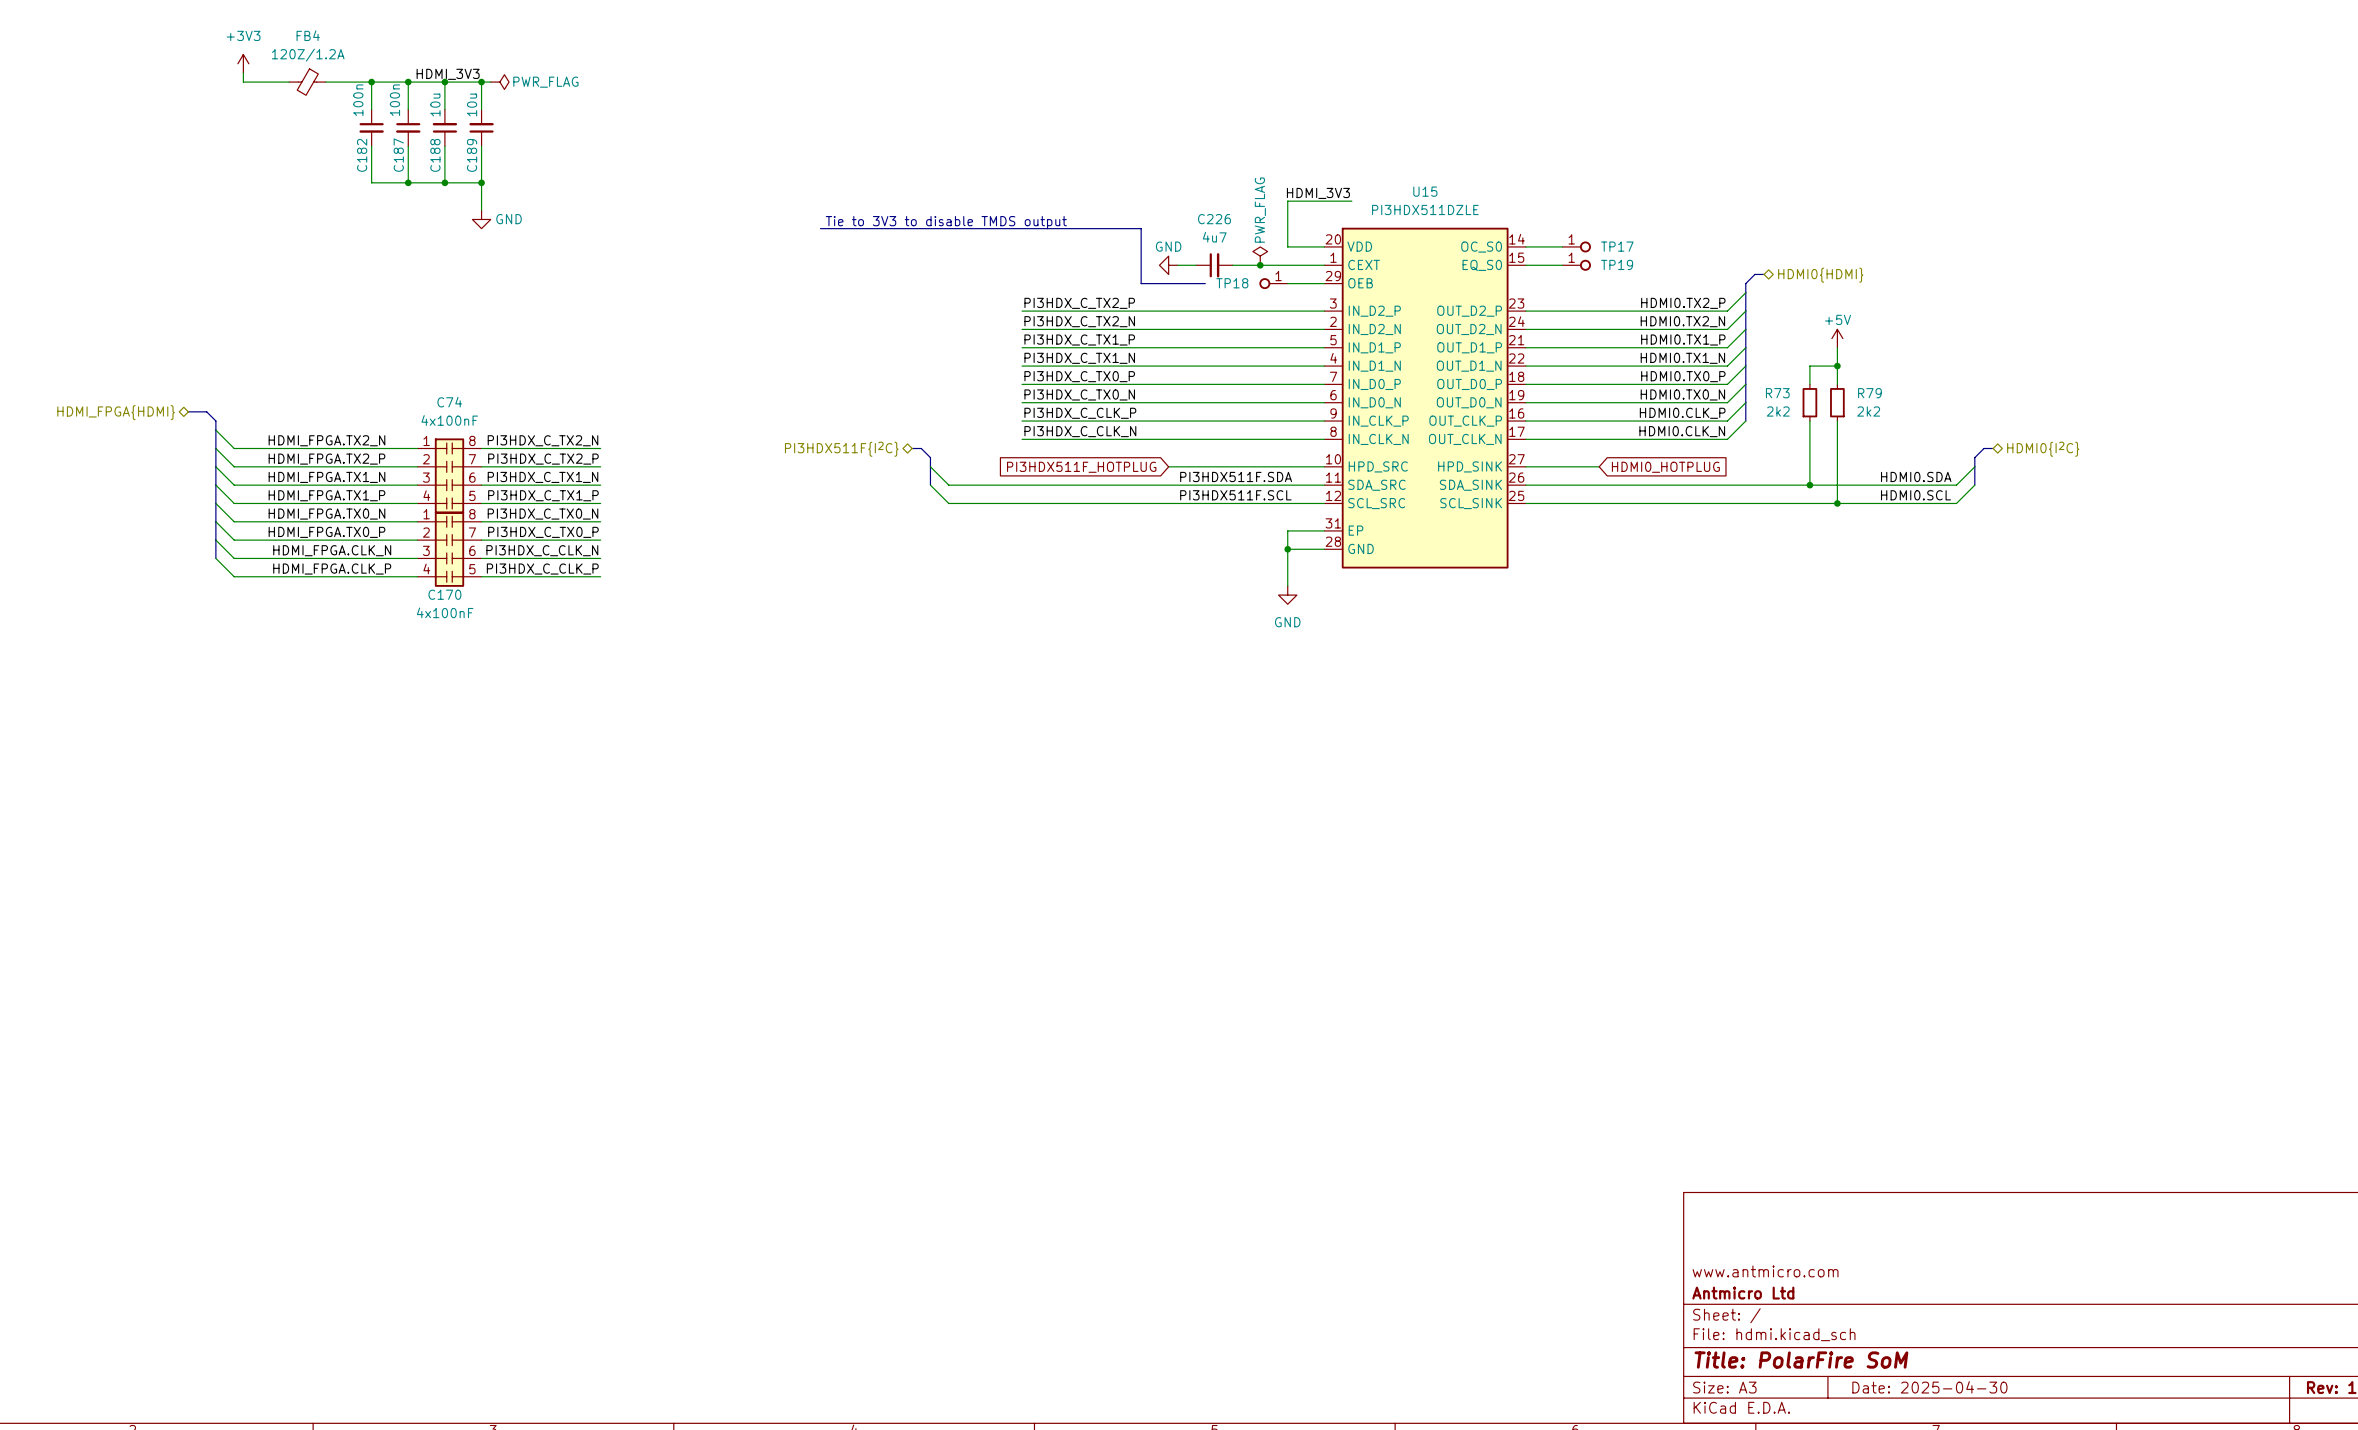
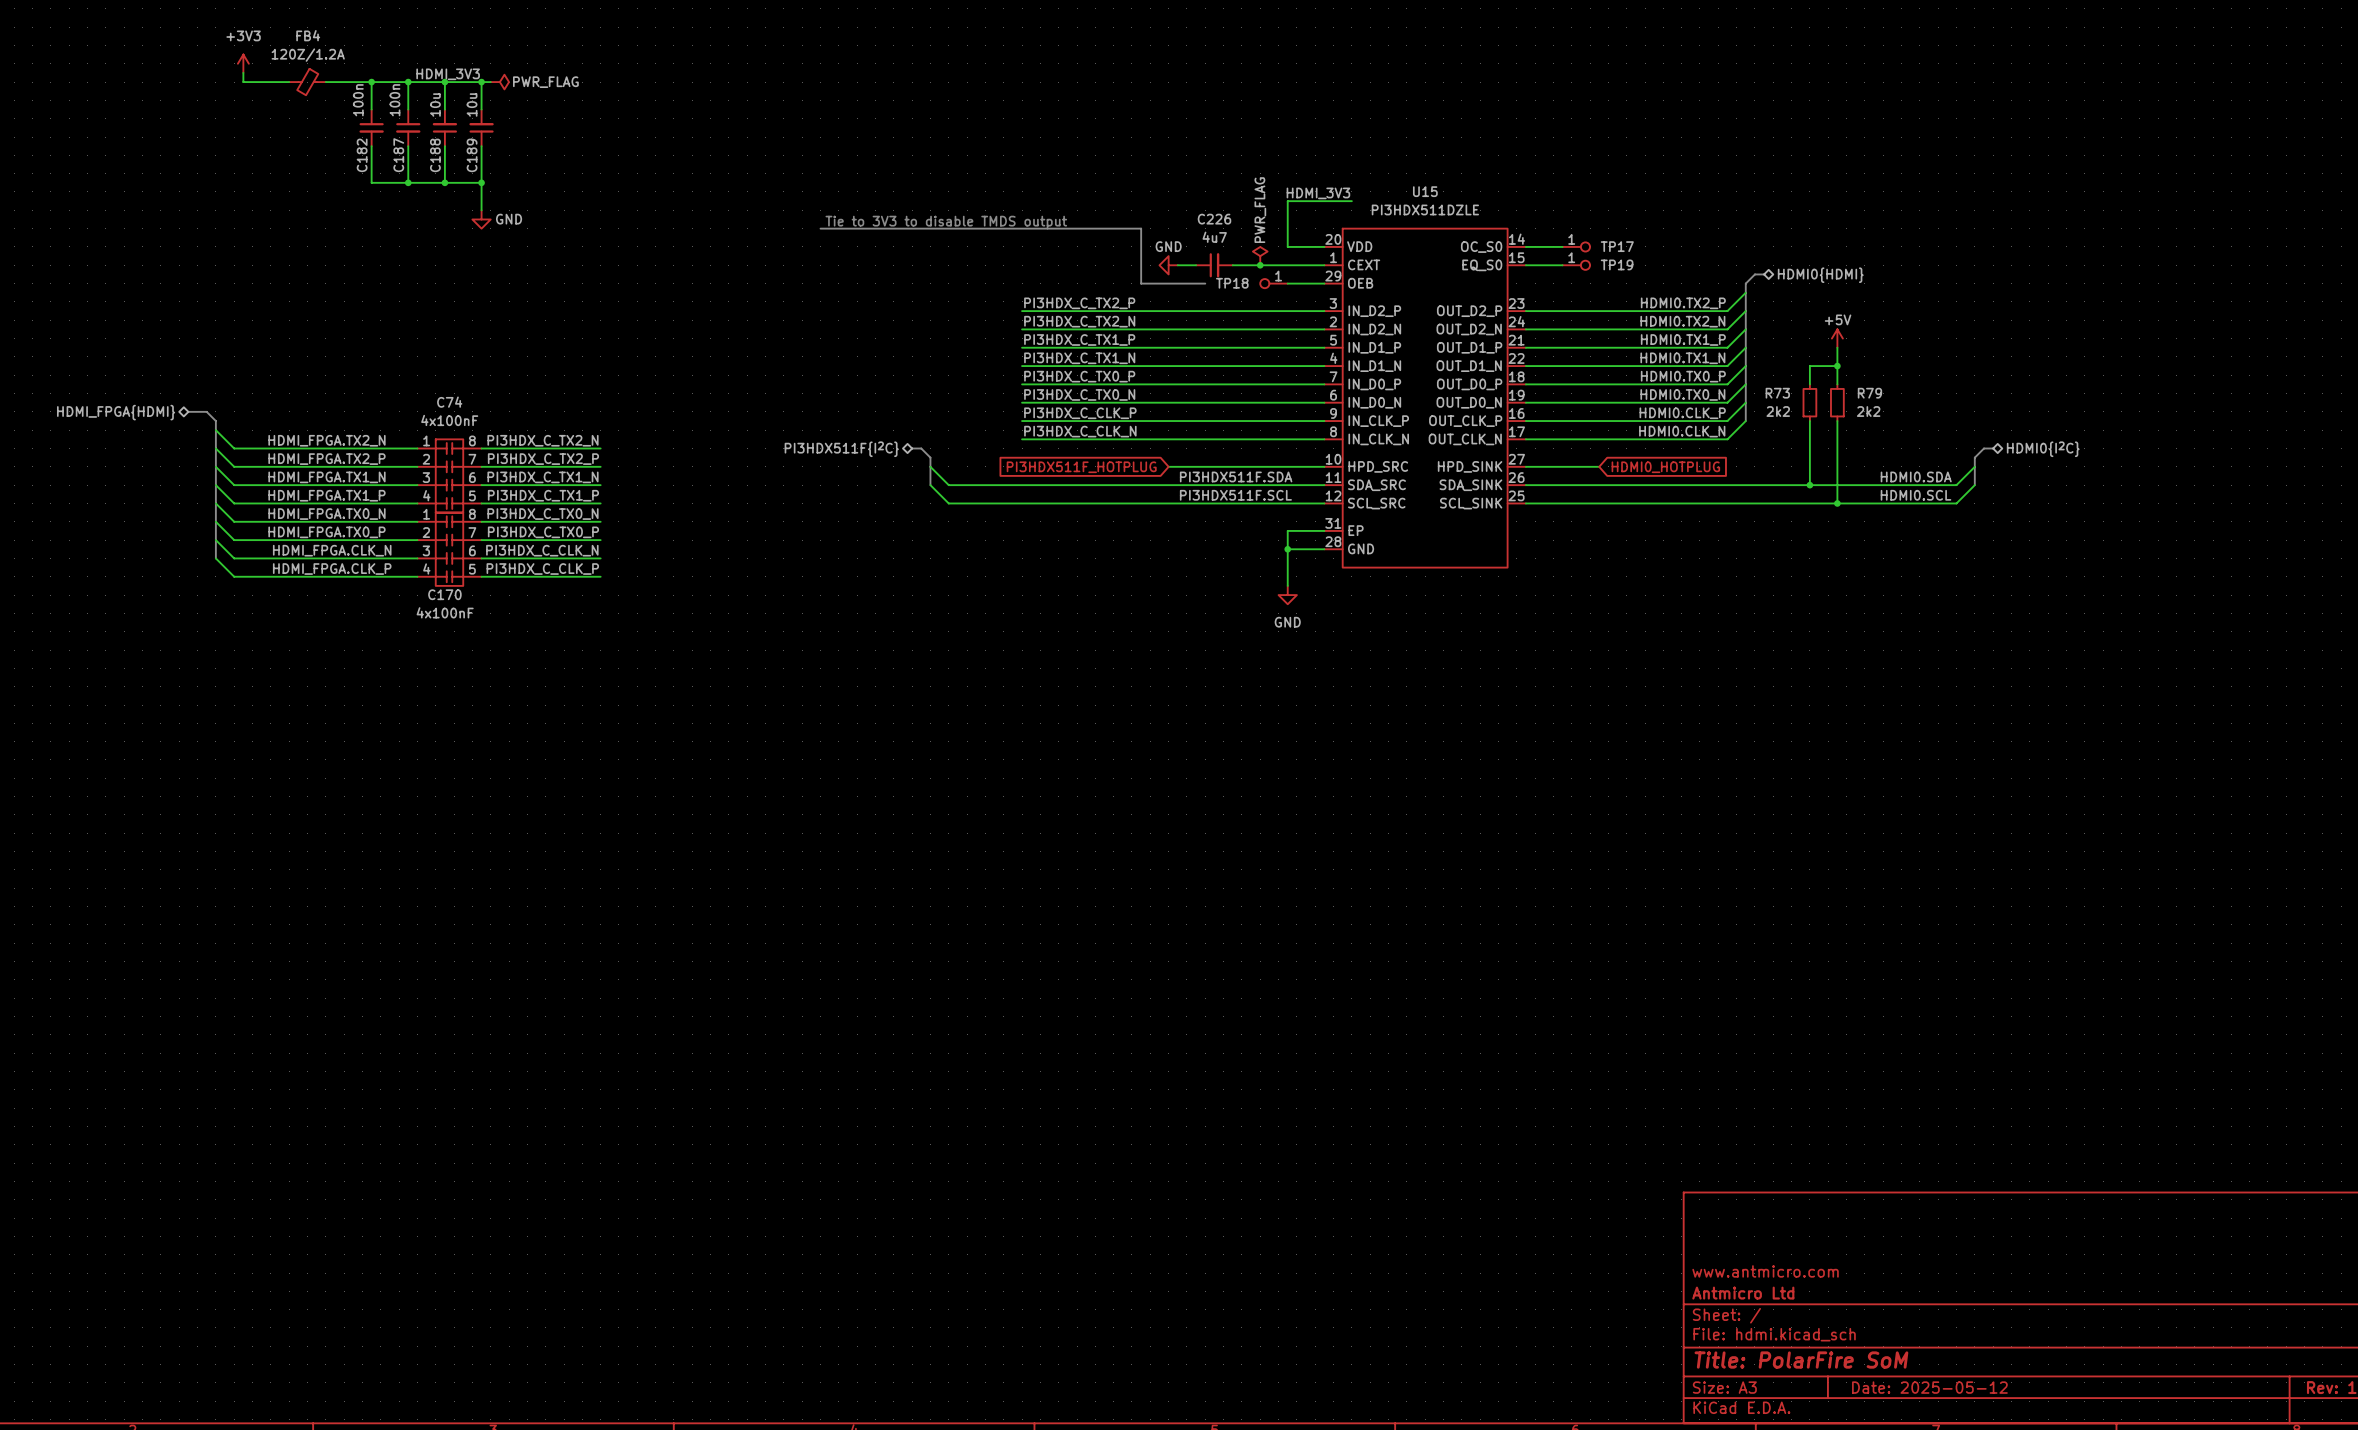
title block: Date: 2025-04-30 (1929, 1387) -> Date: 2025-05-12 (1929, 1387)

